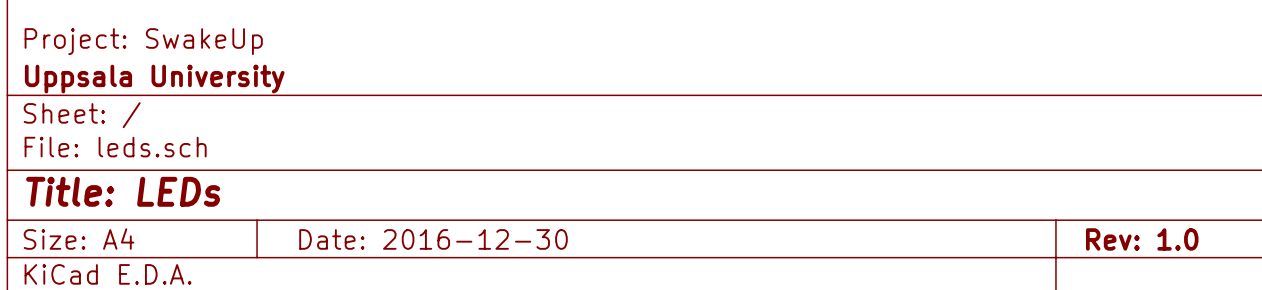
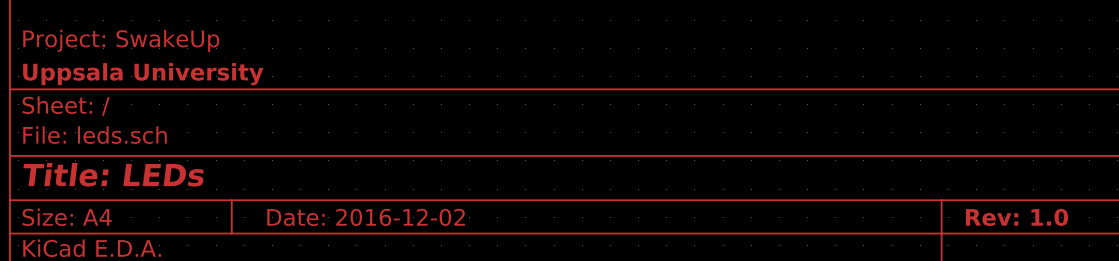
title block: Date: 2016-12-30 (433, 239) -> Date: 2016-12-02 (366, 217)

